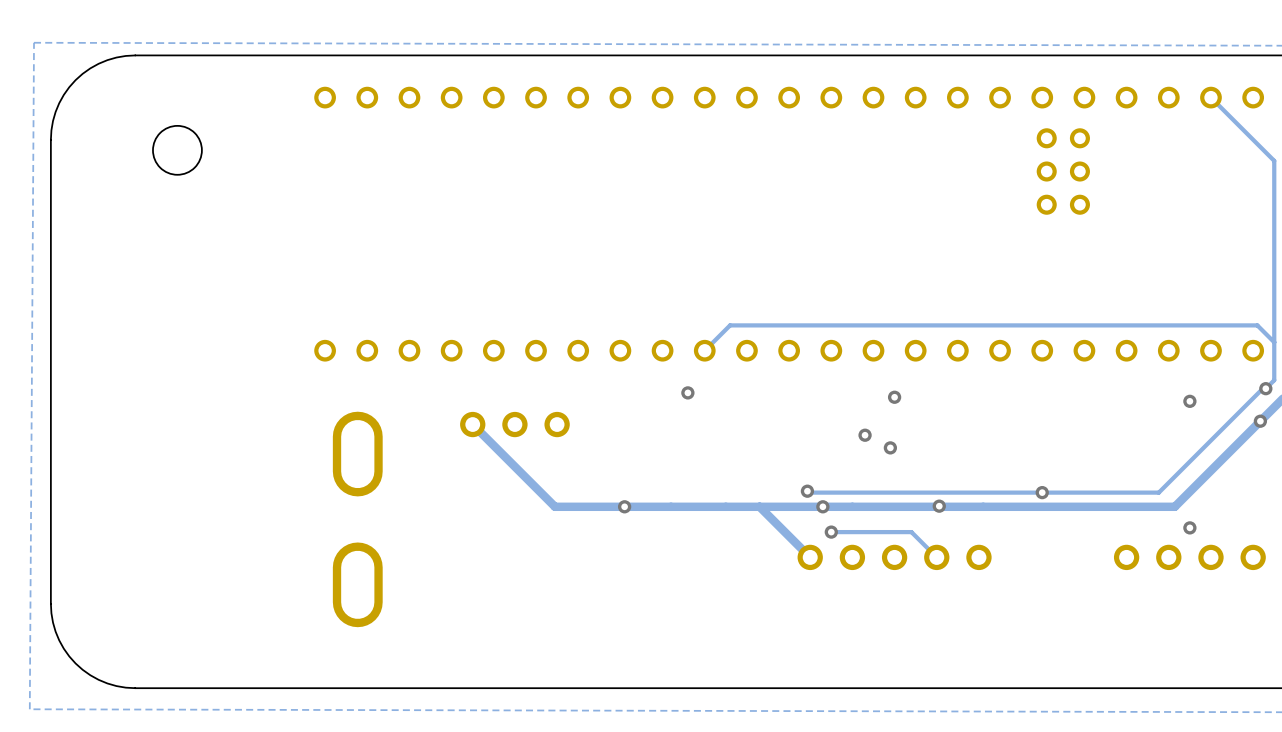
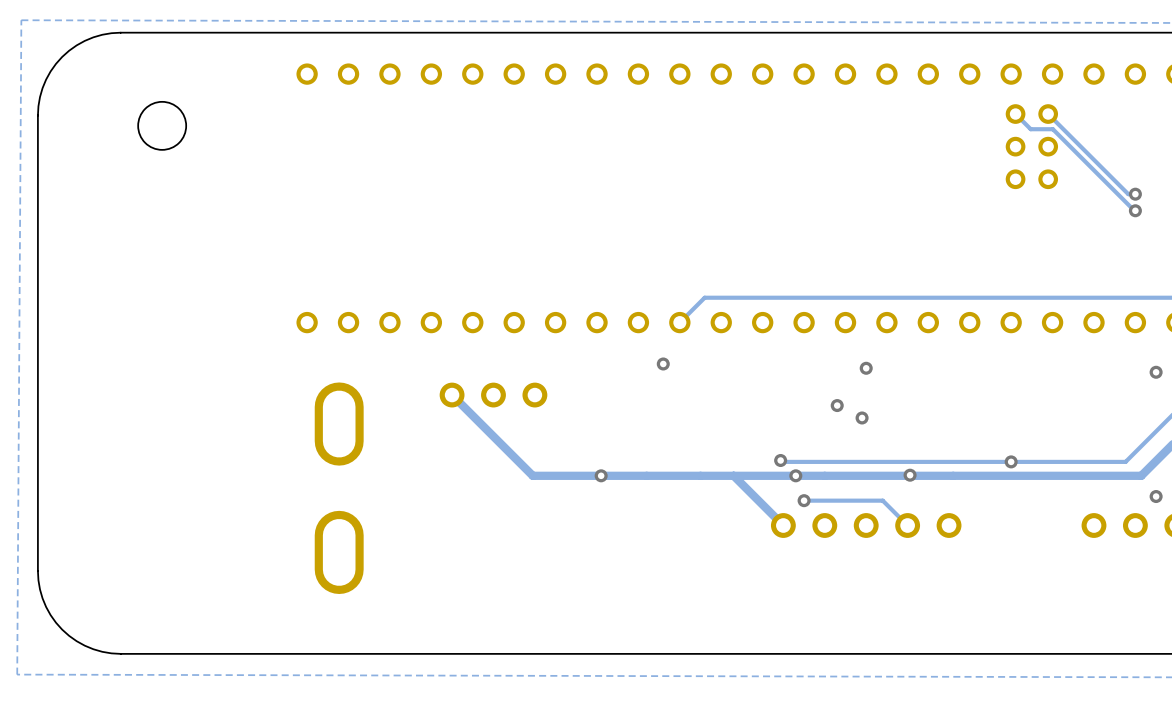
track: none -> (1015, 114) (1030, 129) (1052, 129) (1135, 210)
track: none -> (1048, 114) (1128, 194) (1135, 194)
via: none -> (1135, 194)
via: none -> (1135, 210)

